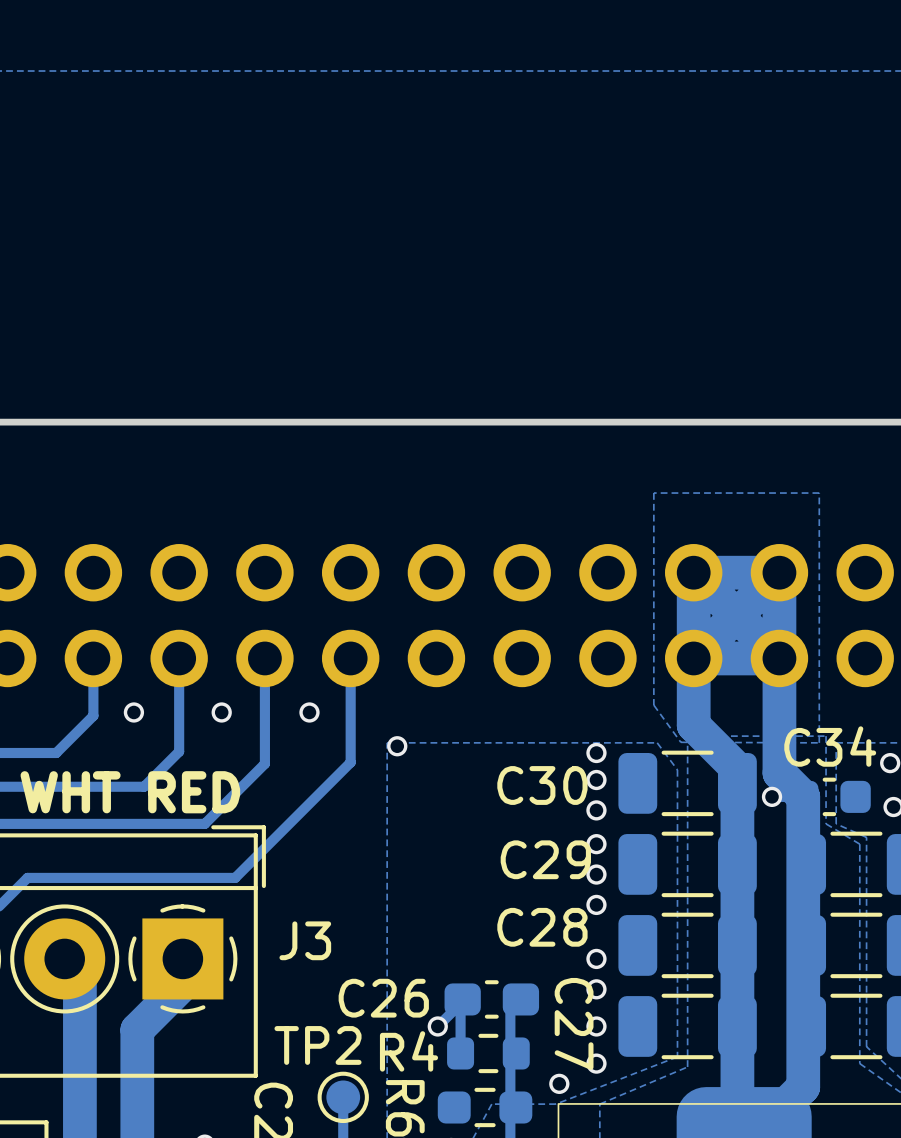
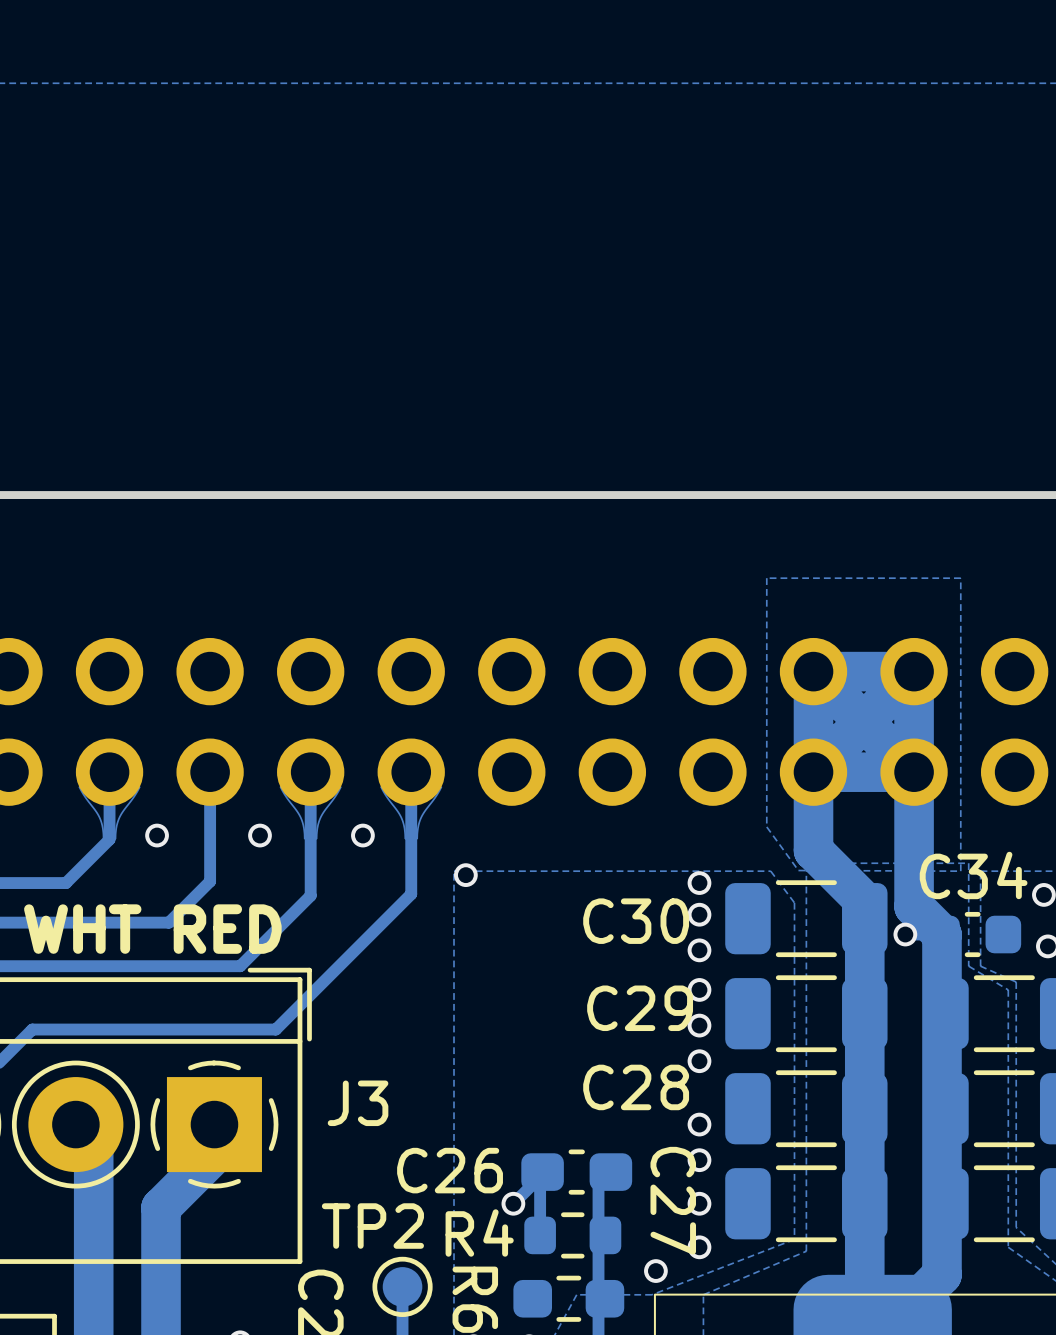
zone outline: none -> (109, 755) (79, 786) (99, 817) (103, 839) (115, 839) (119, 817) (139, 786) (109, 755)
zone outline: none -> (310, 755) (280, 786) (300, 817) (304, 839) (316, 839) (320, 817) (340, 786) (310, 755)
zone outline: none -> (411, 755) (380, 786) (401, 817) (405, 839) (417, 839) (421, 817) (441, 786) (411, 755)

